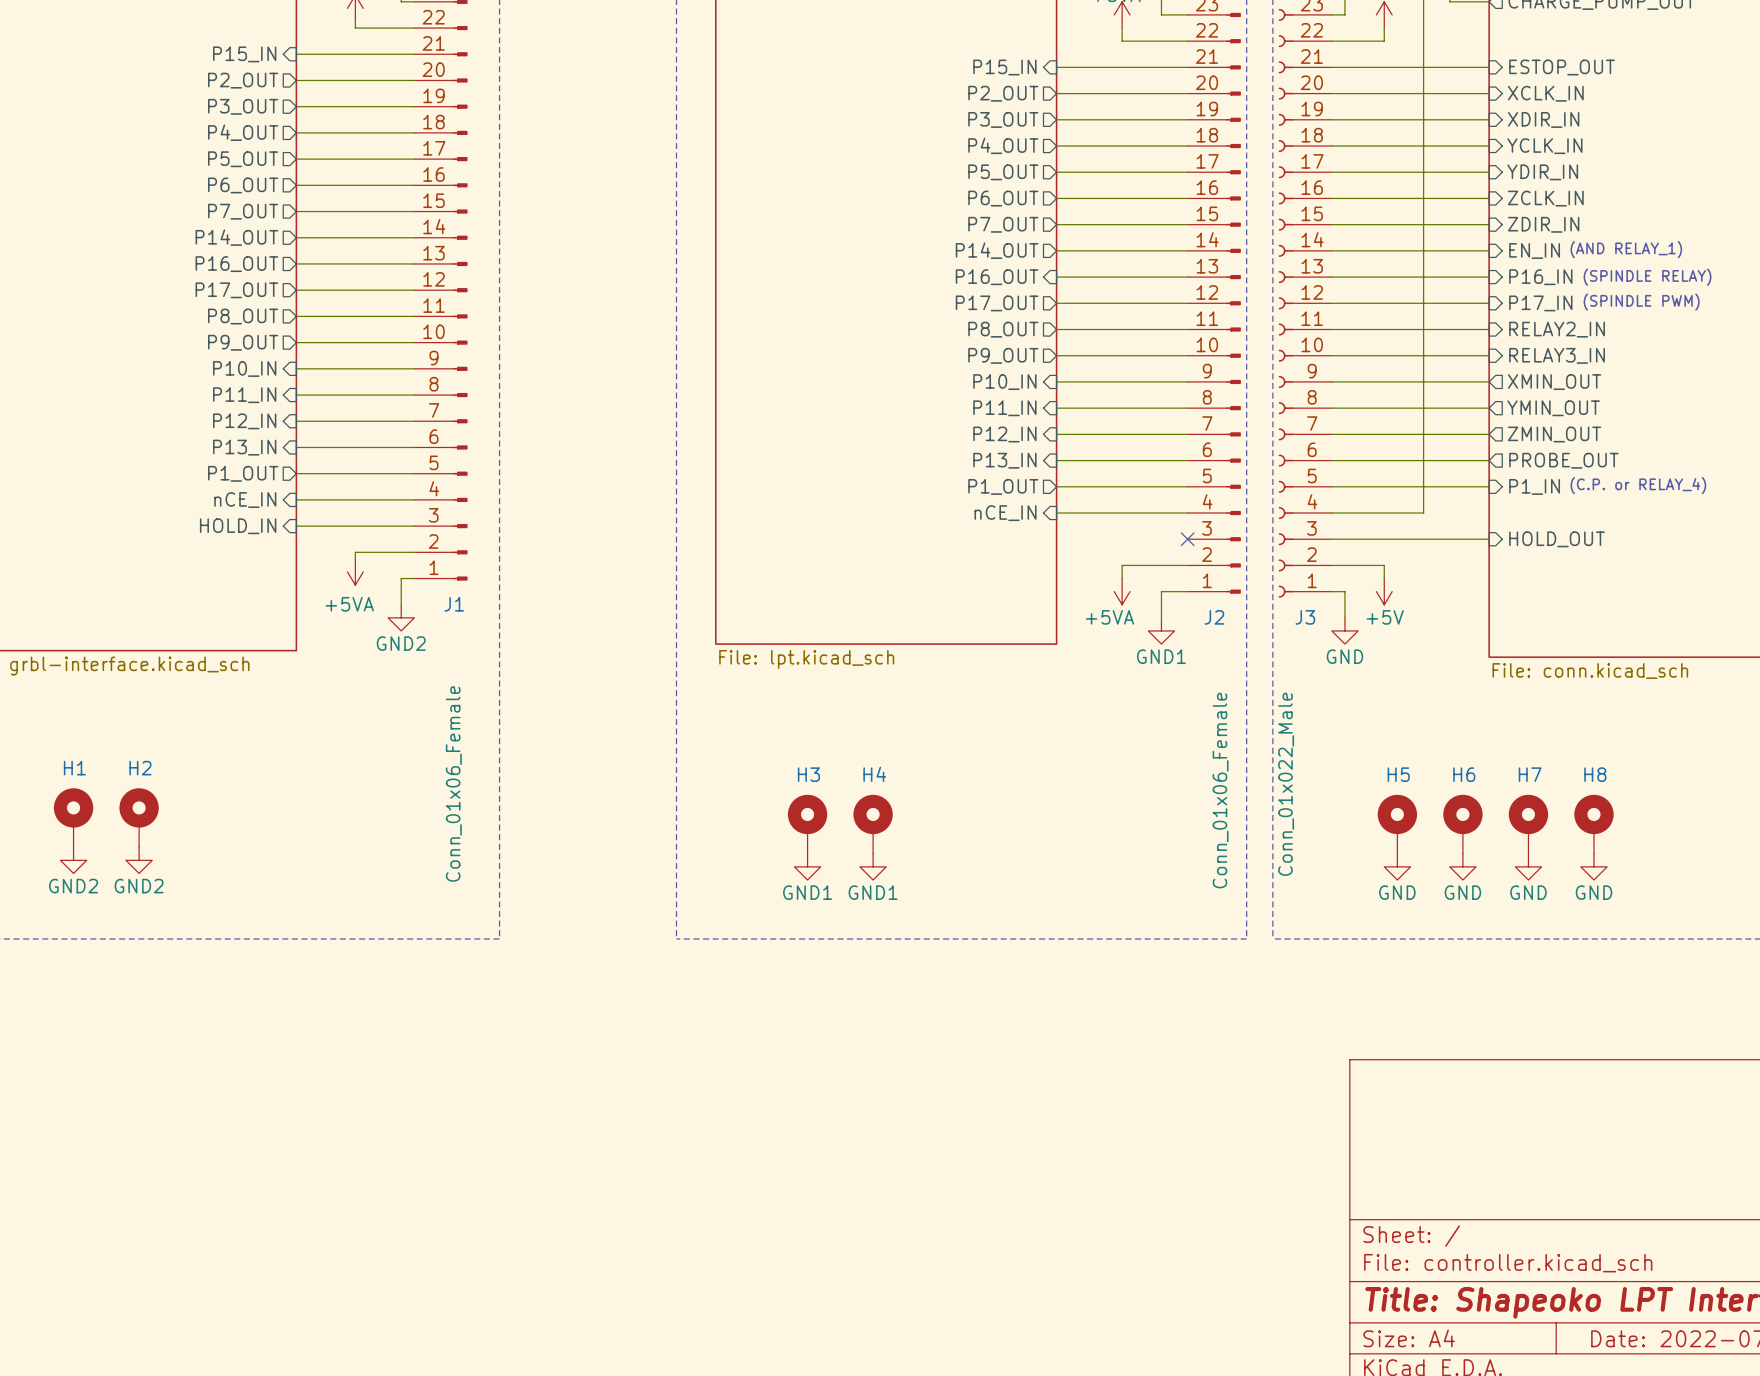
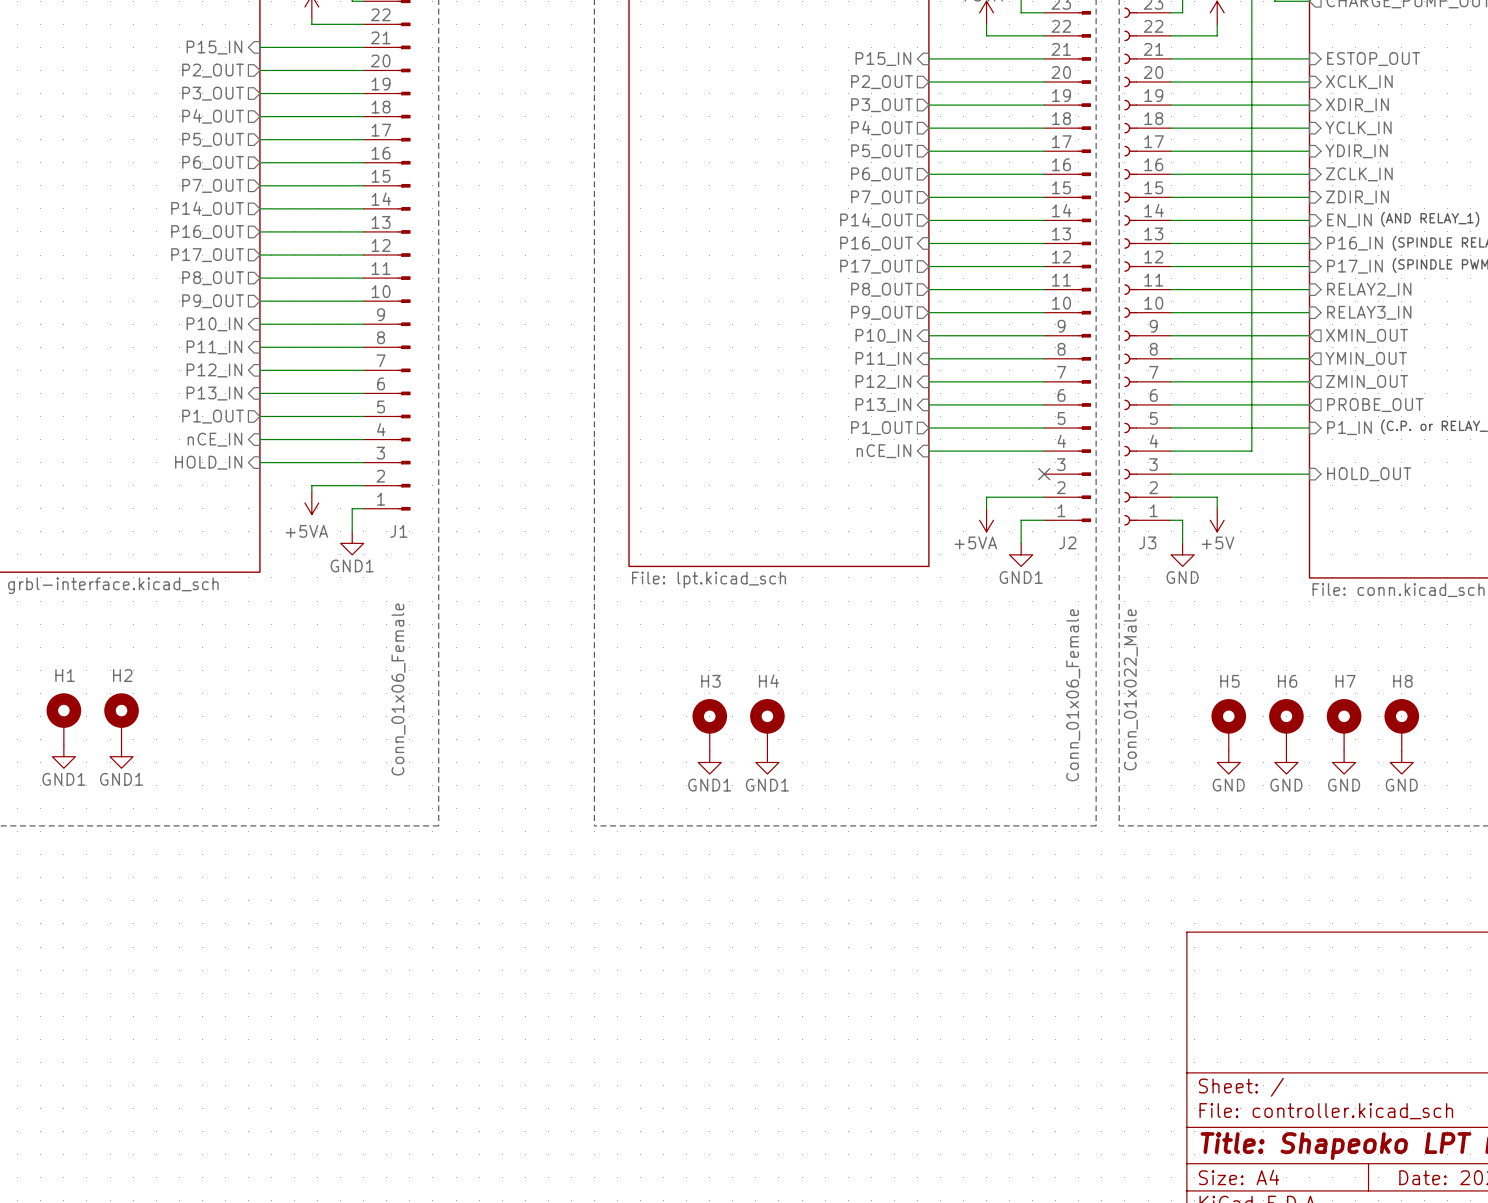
power symbol: GND2 (401, 617) -> GND1 (352, 543)
power symbol: GND2 (73, 860) -> GND1 (63, 756)
power symbol: GND2 (139, 860) -> GND1 (121, 756)

